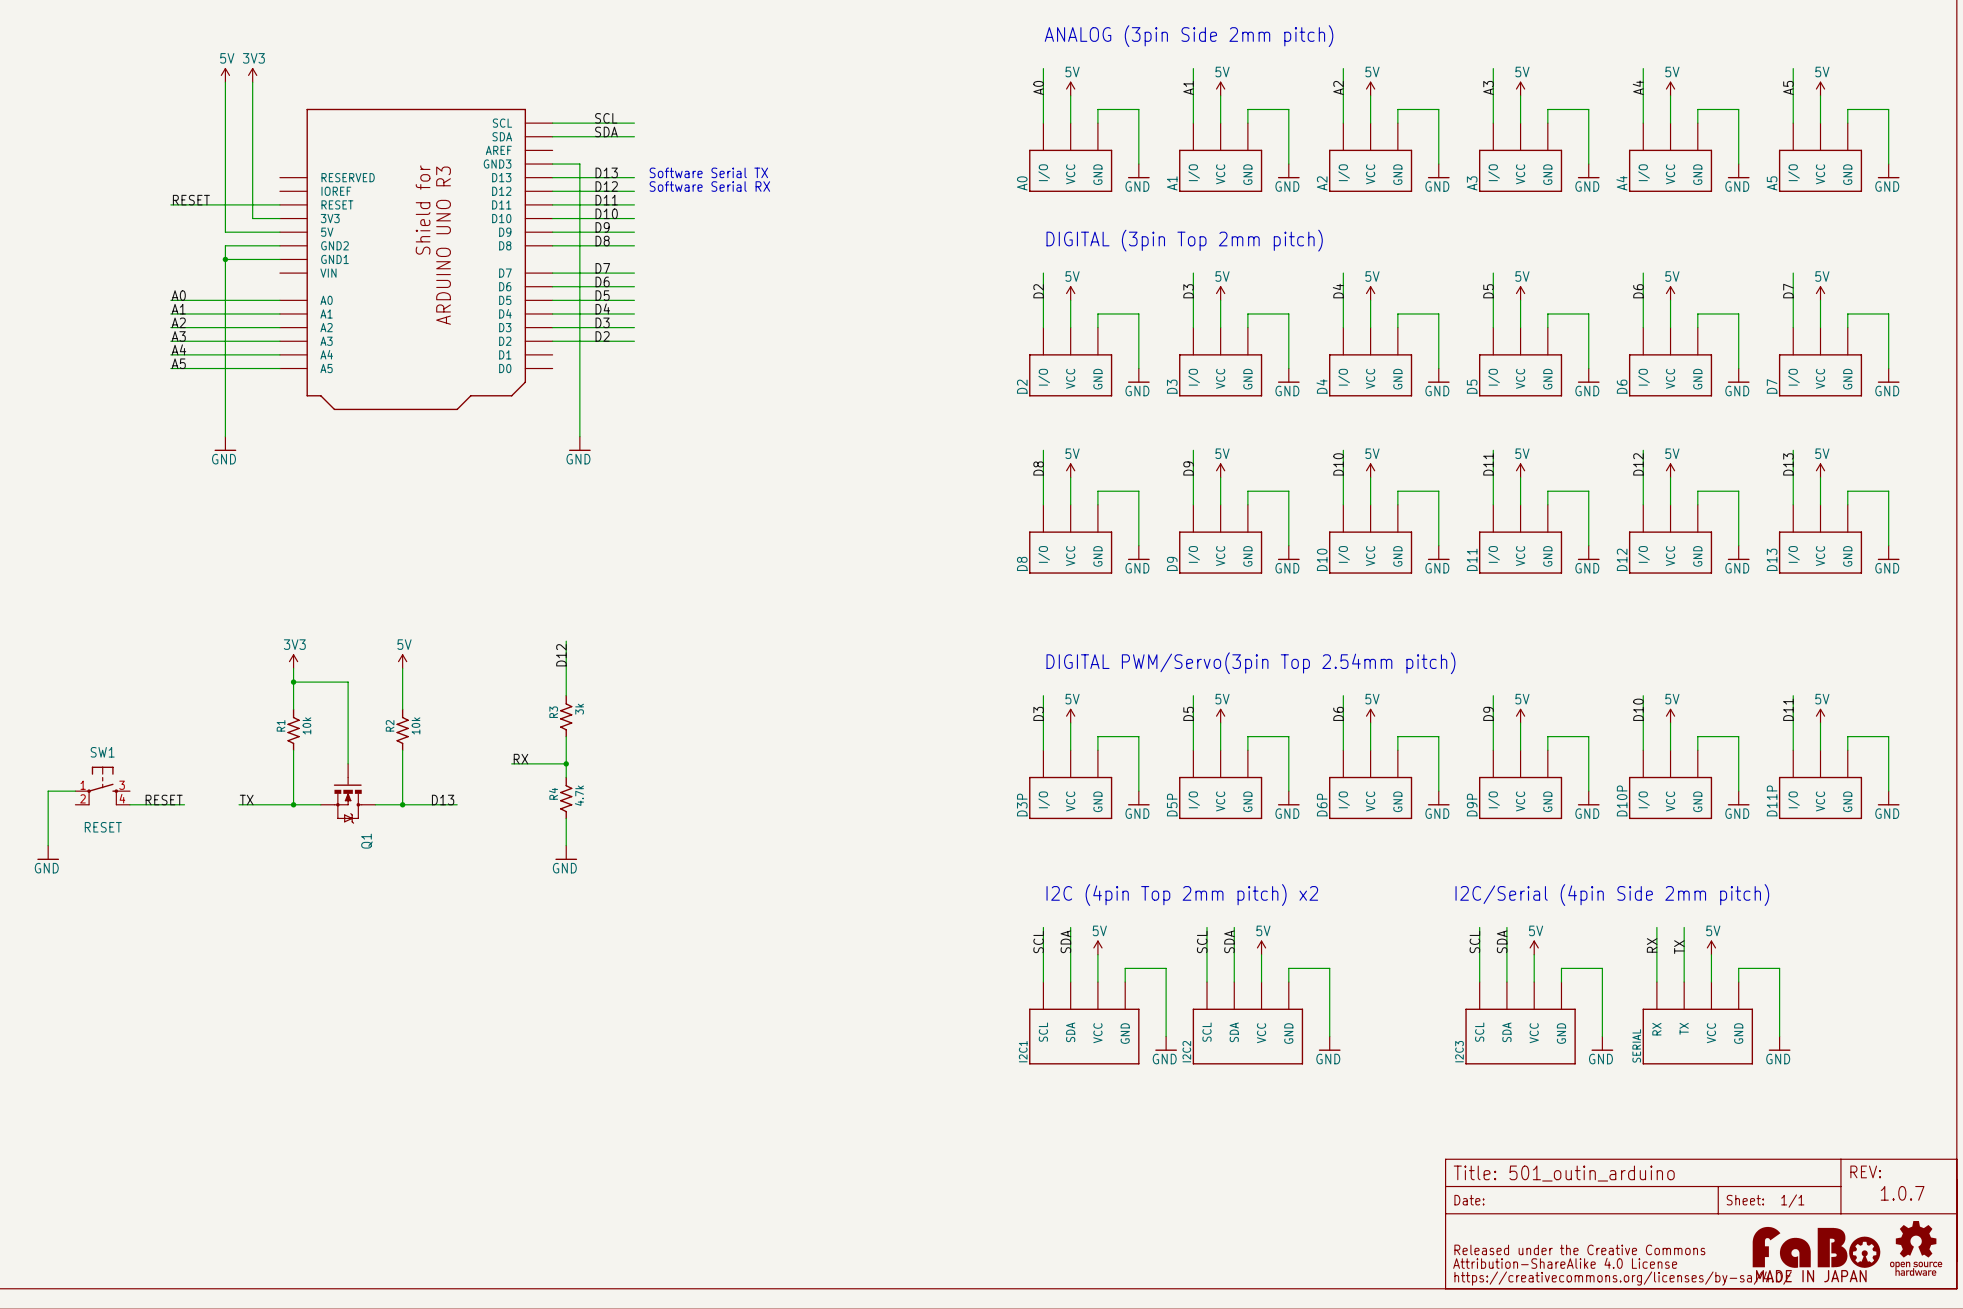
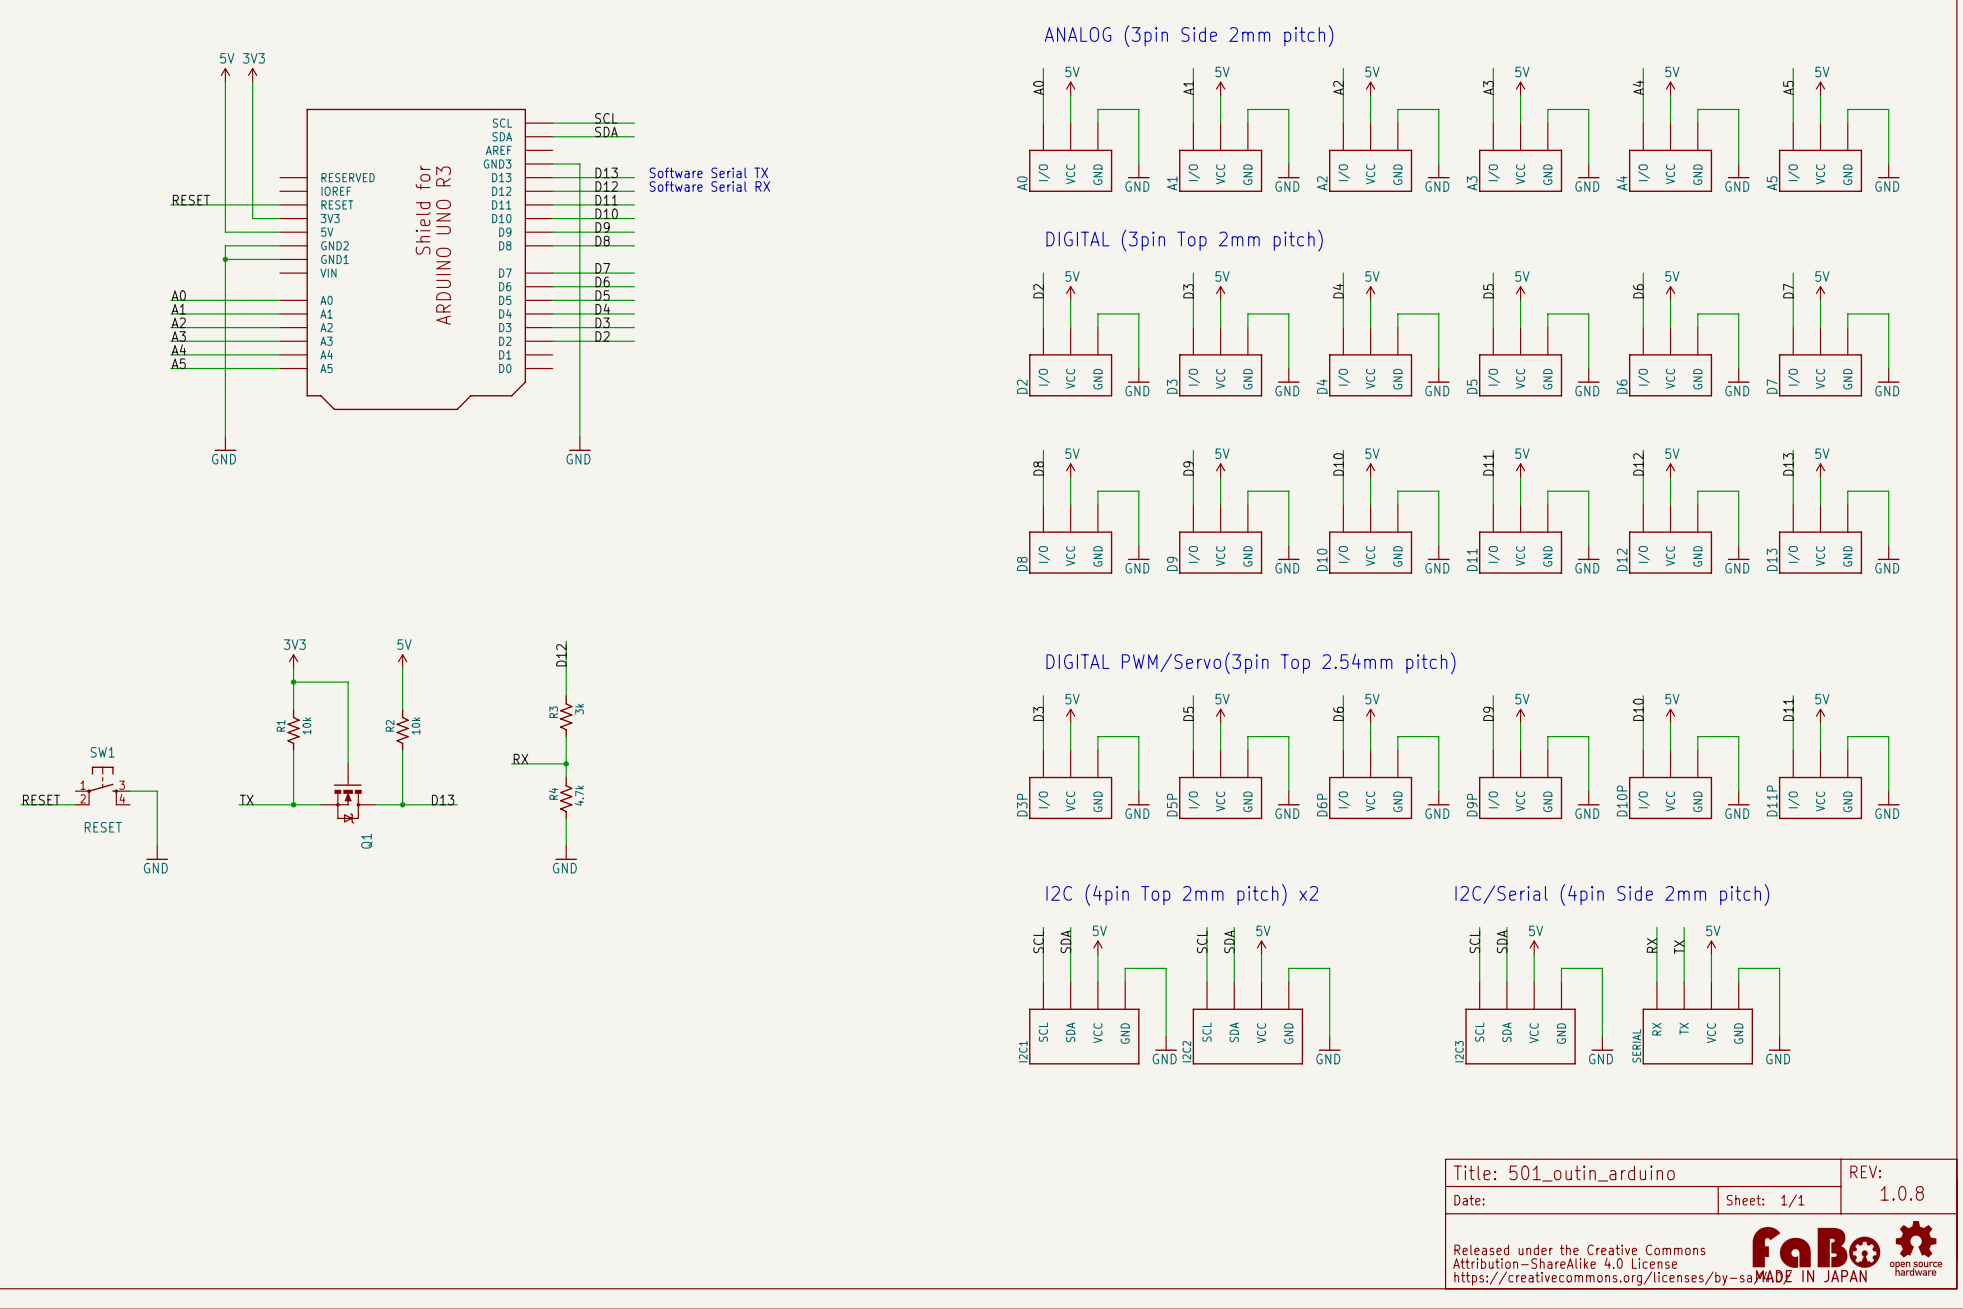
wire: (75, 791) (48, 791) (48, 845) -> none
wire: none -> (129, 791) (157, 791) (157, 845)
label position: RESET (164, 800) -> RESET (41, 800)
wire: (129, 804) (184, 804) -> (20, 804) (75, 804)
power symbol position: GND (48, 852) -> GND (157, 852)
text: 1.0.7 (1902, 1193) -> 1.0.8 (1902, 1193)

